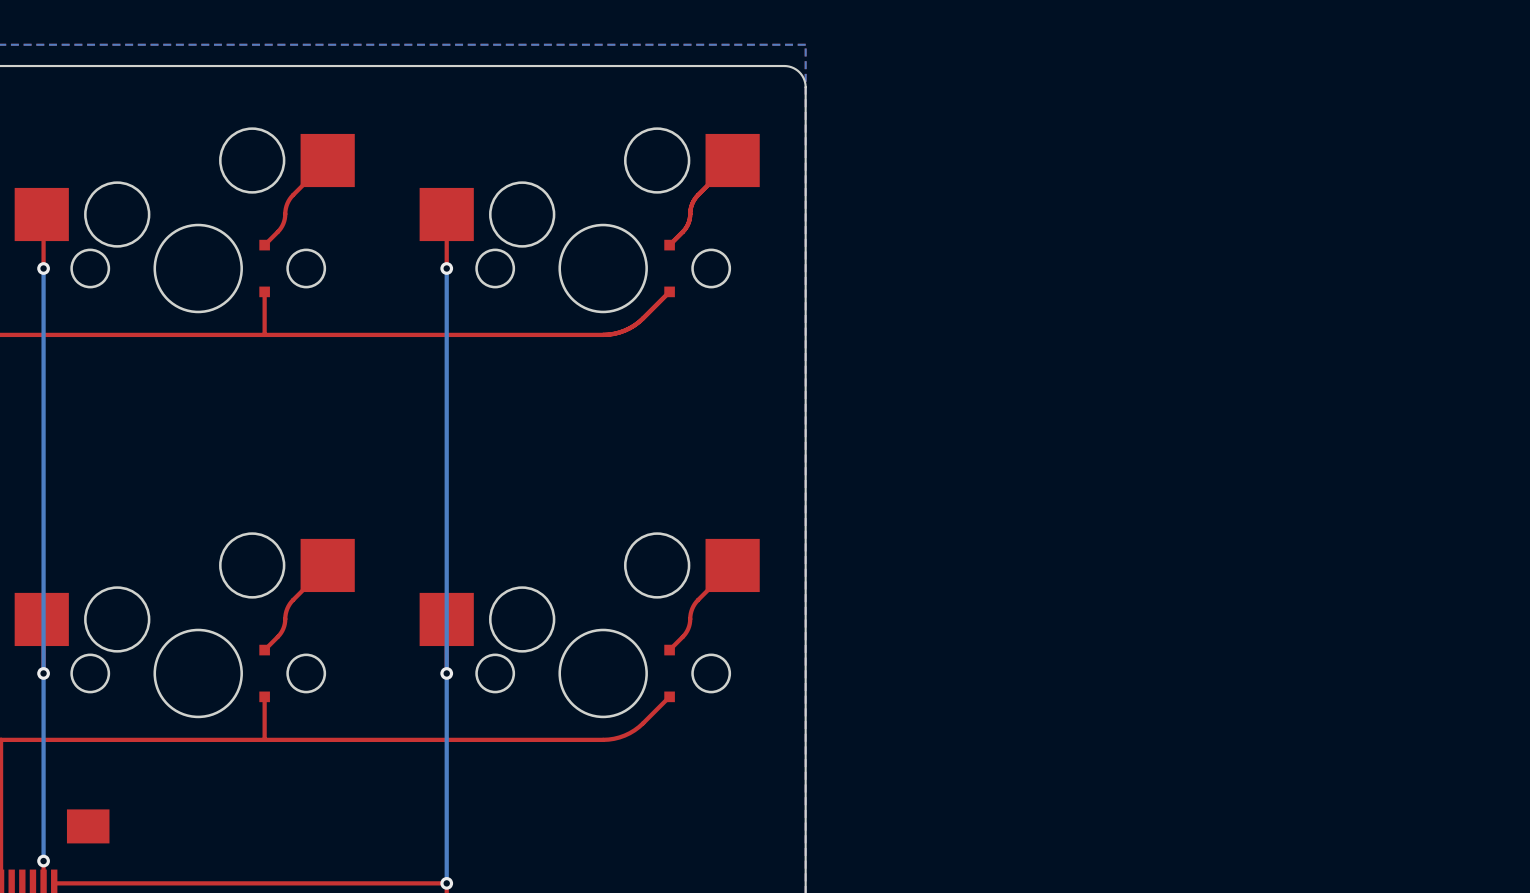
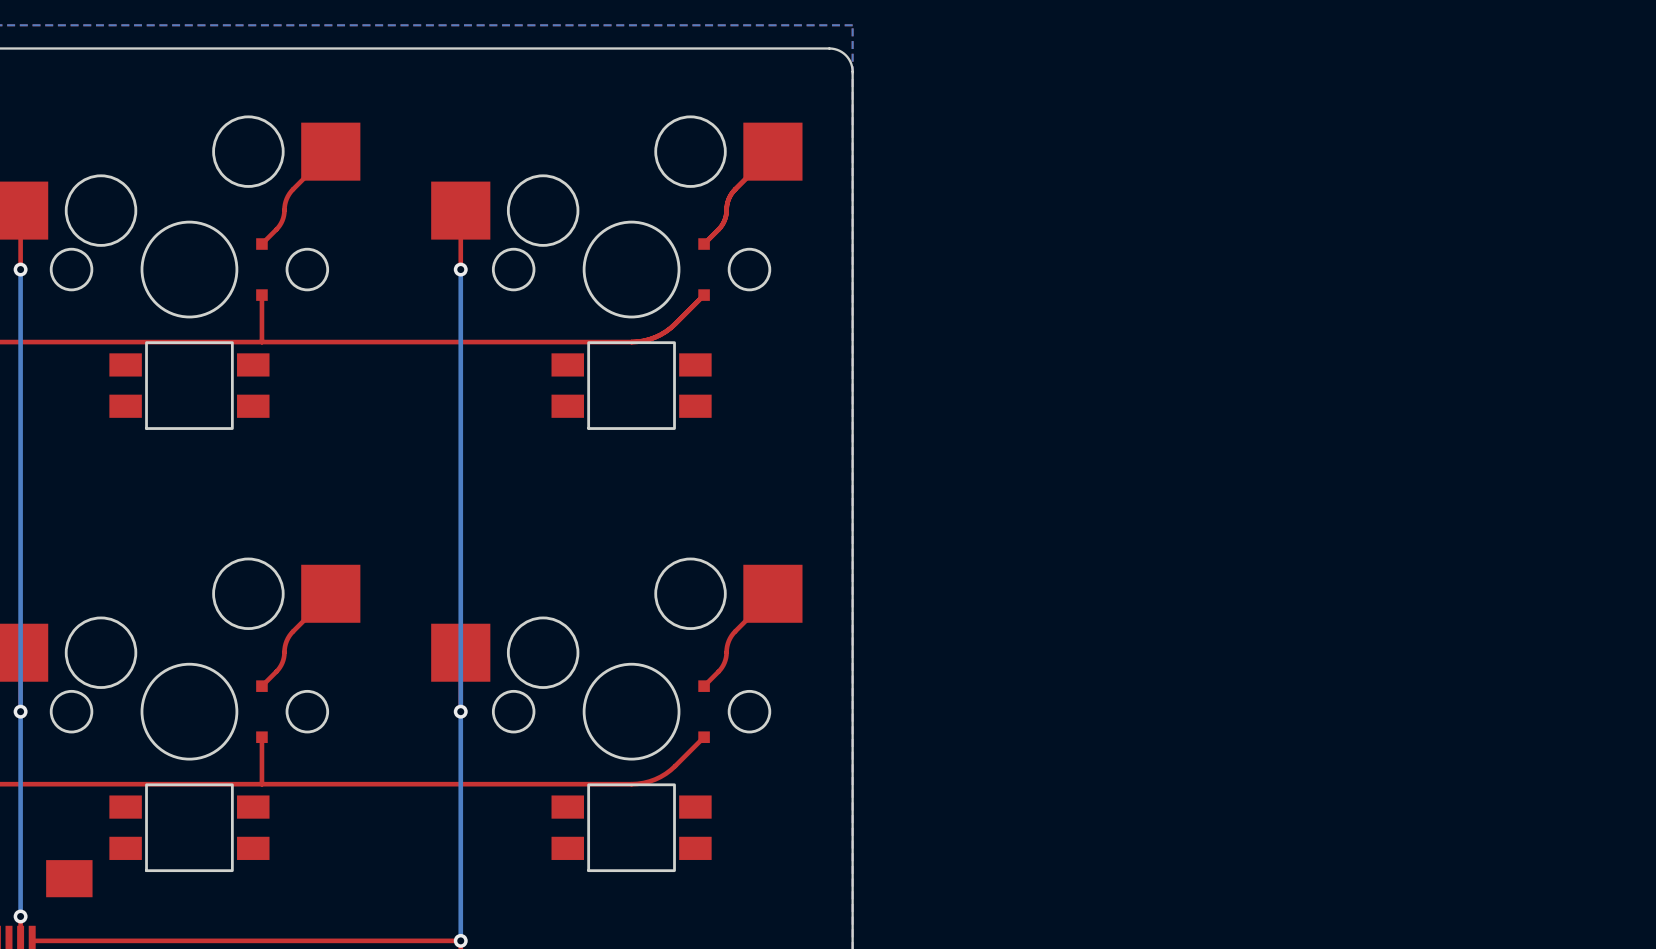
part: none -> (189, 385)
part: none -> (631, 385)
part: none -> (189, 827)
part: none -> (631, 827)

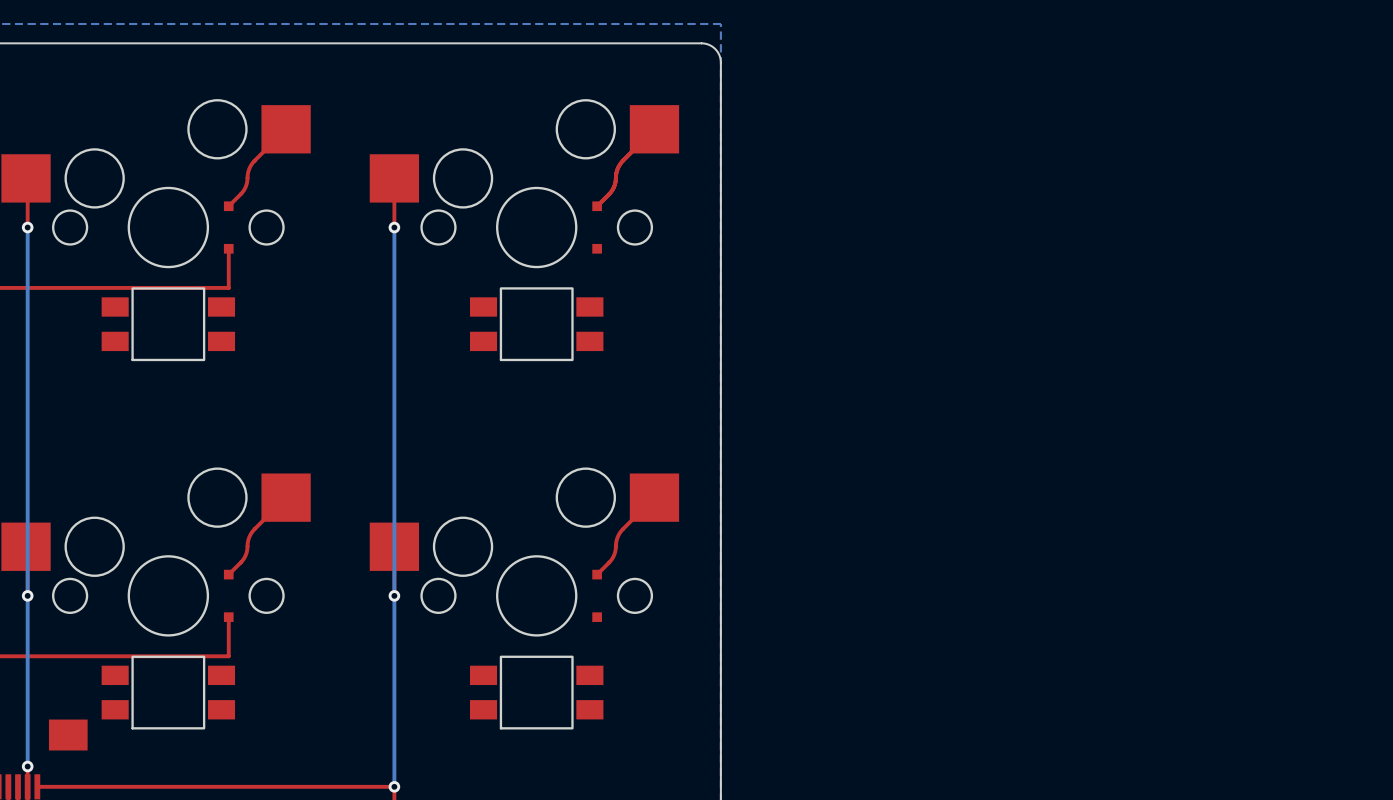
top track: (704, 295) (675, 324) -> none
top track: (675, 324) (655, 337) (631, 342) -> none
top track: (675, 324) (655, 337) (631, 342) -> none
top track: (631, 342) (261, 342) -> none
top track: (704, 737) (665, 773) (655, 779) (637, 783) (261, 784) -> none

